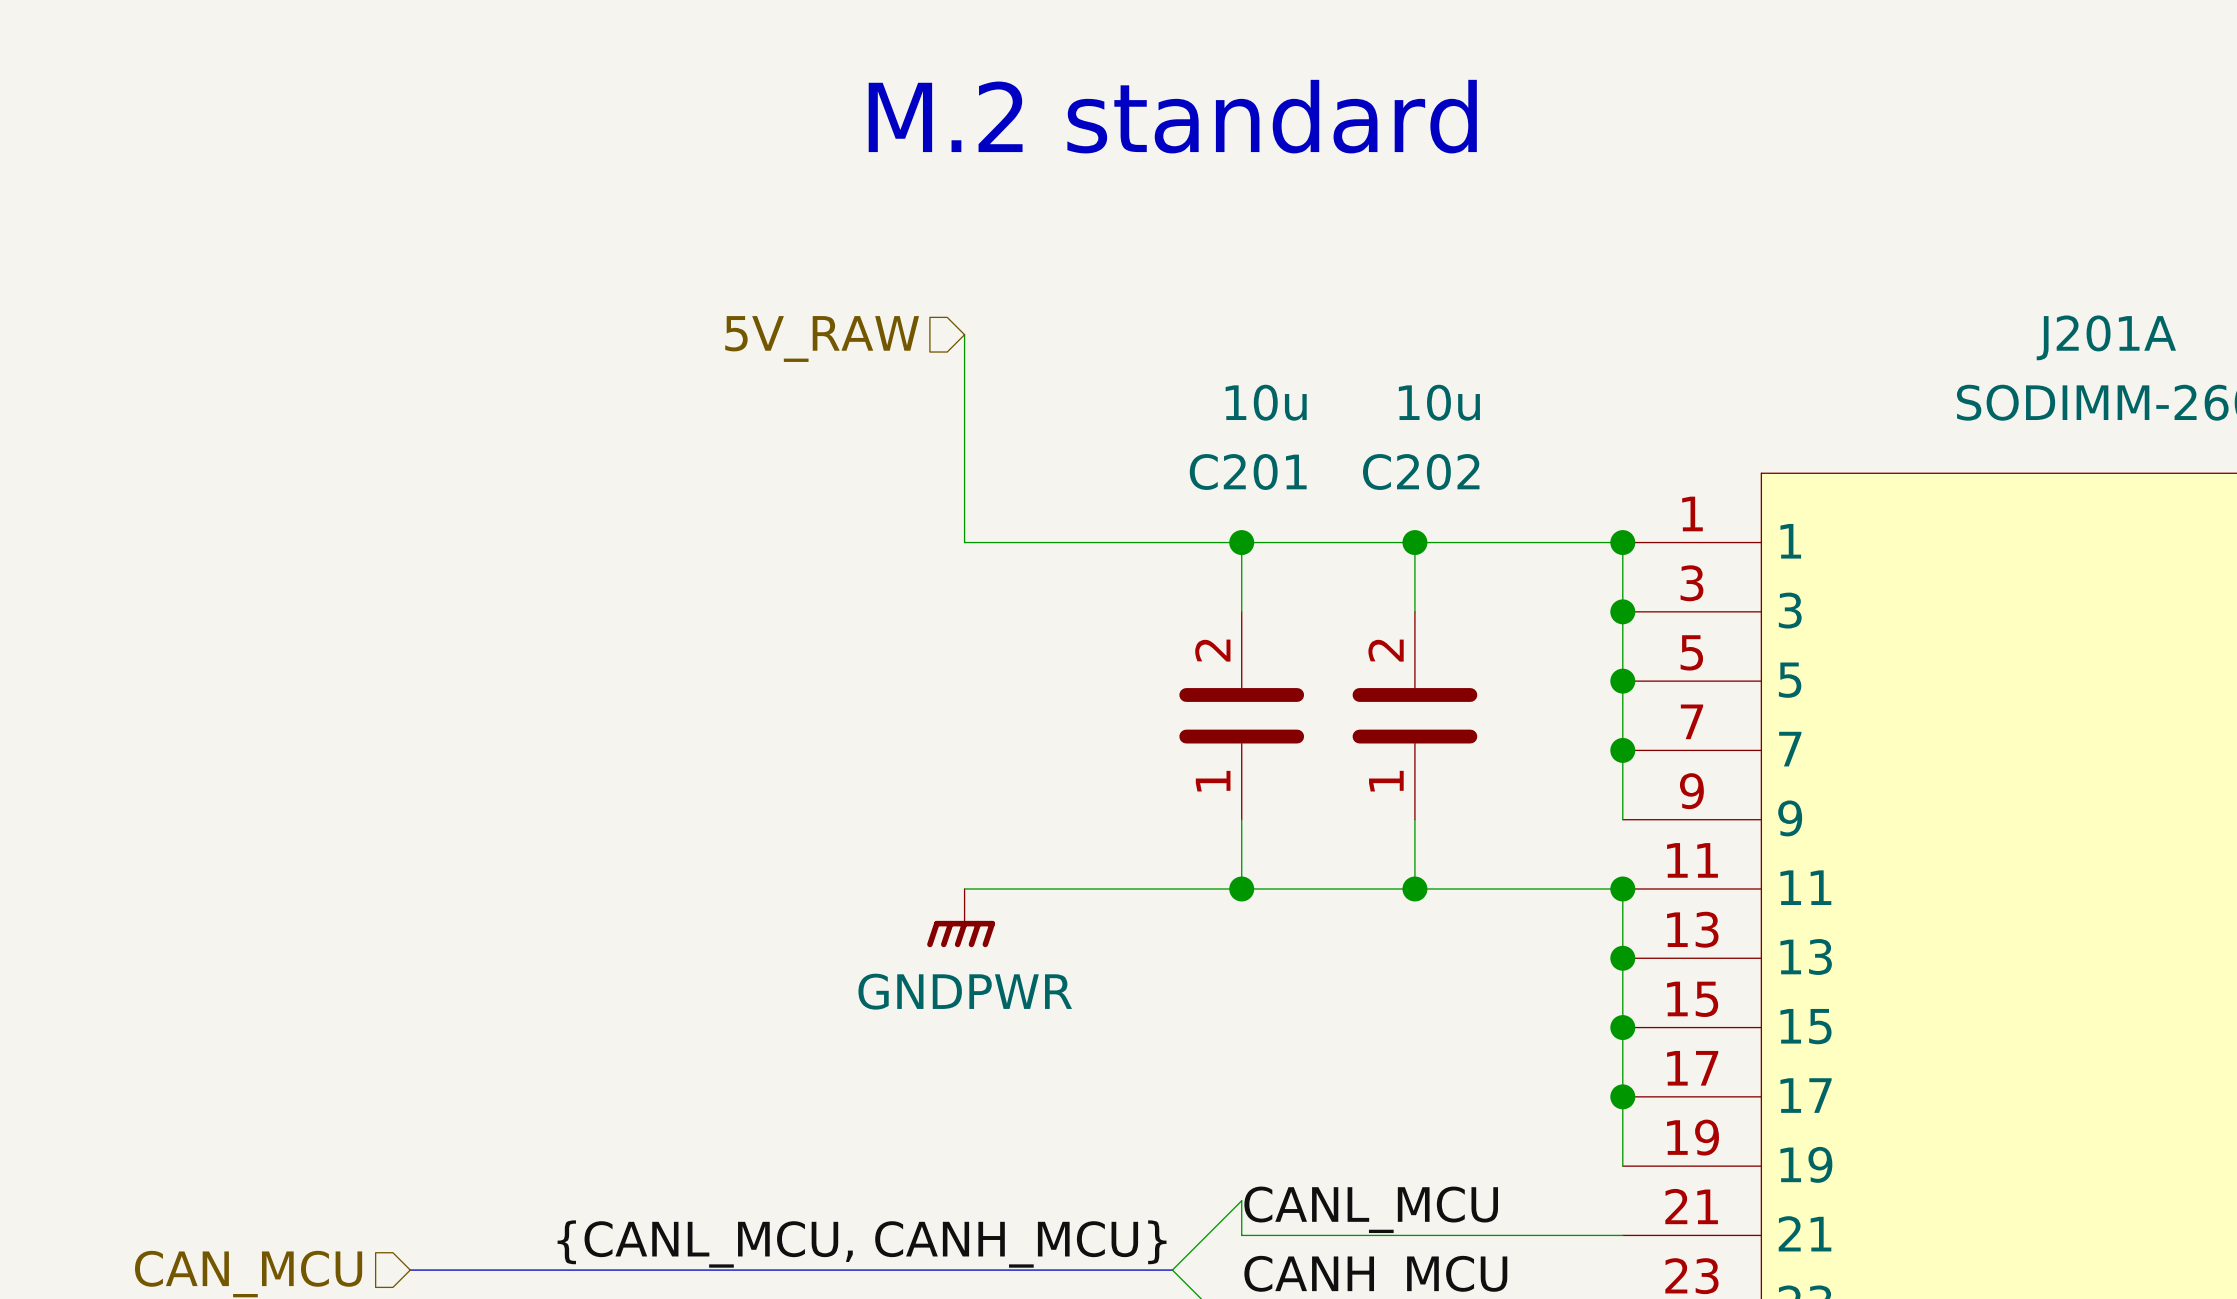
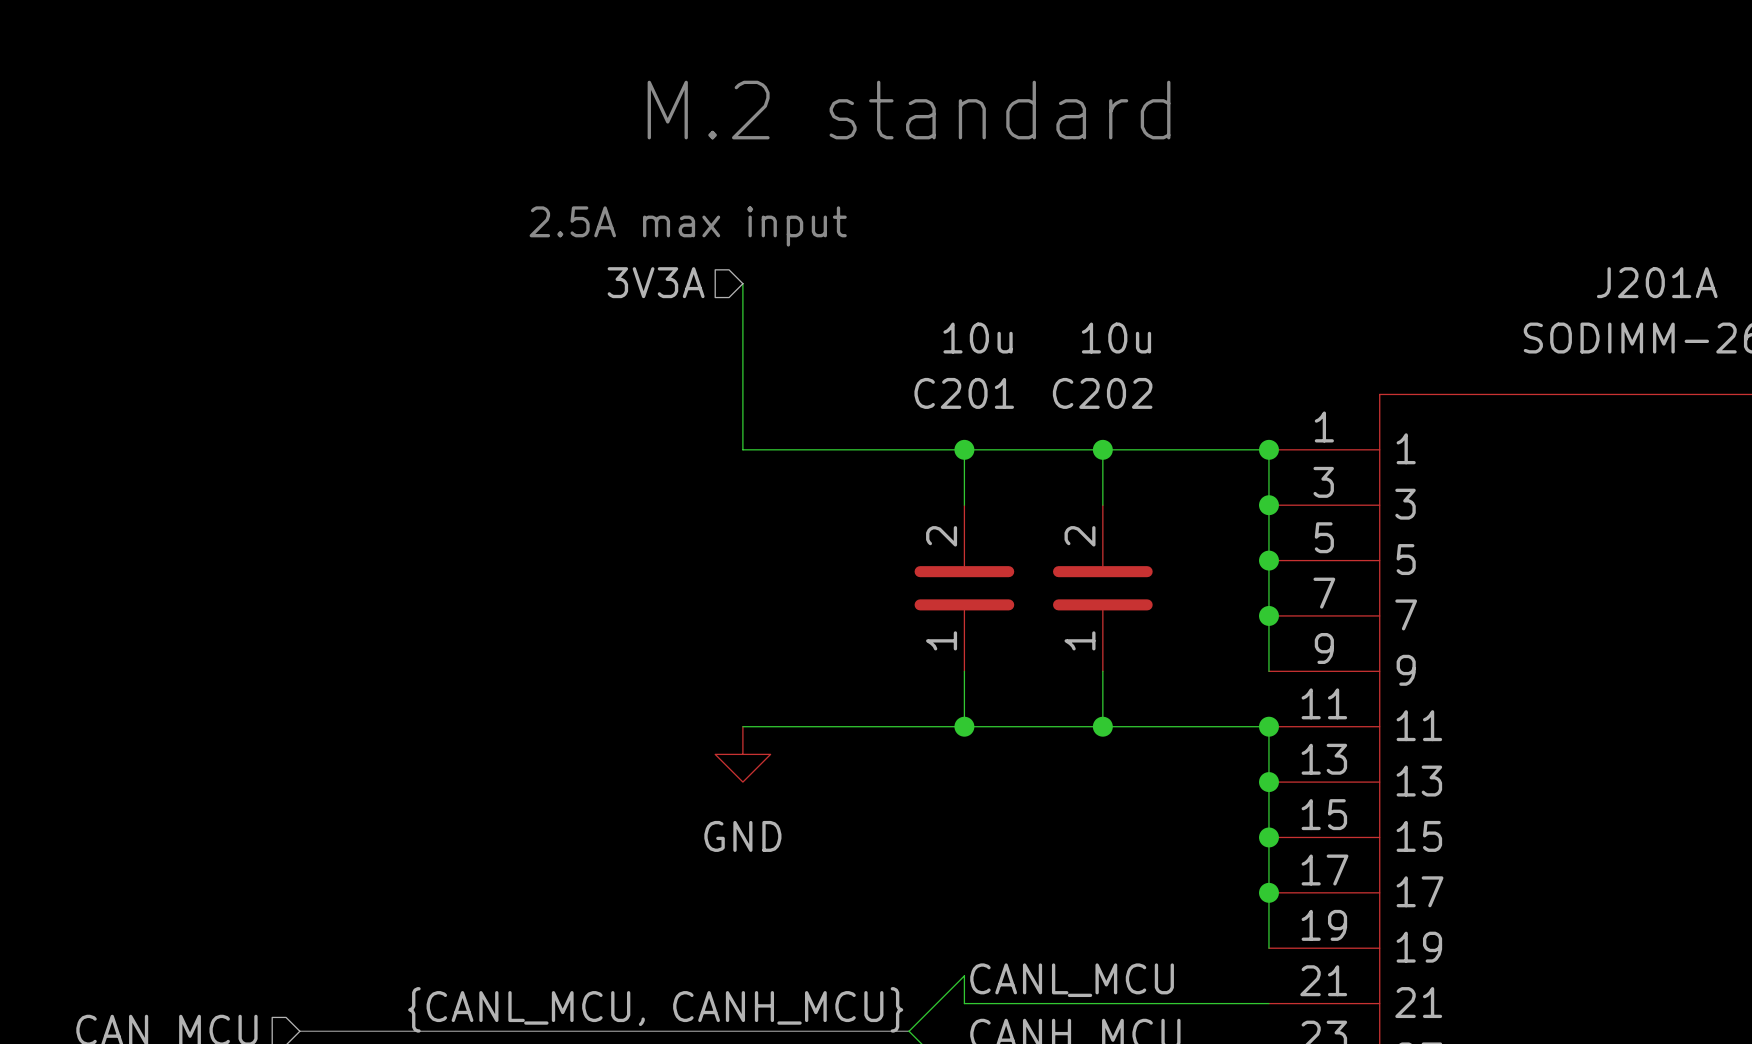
text: none -> 2.5A max input (688, 226)
hierarchical label: 5V_RAW (822, 339) -> 3V3A (656, 282)
power symbol: GNDPWR (961, 918) -> GND (742, 754)

